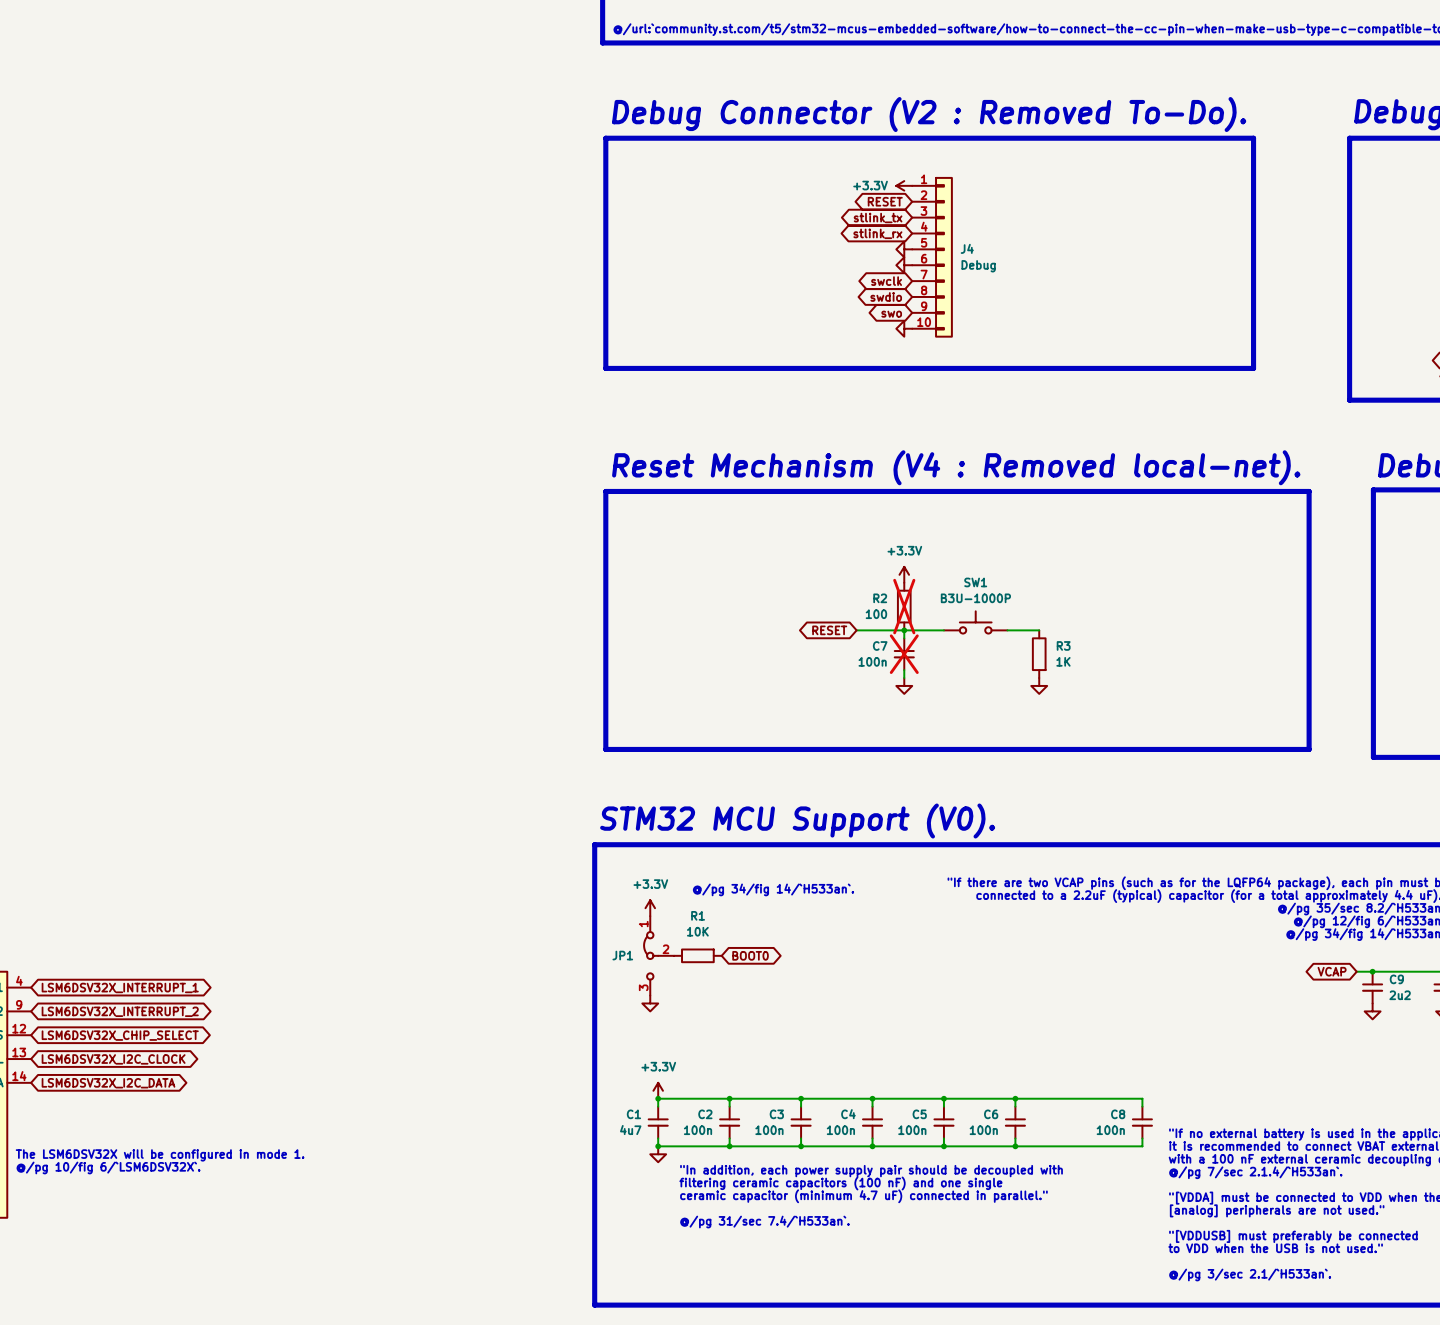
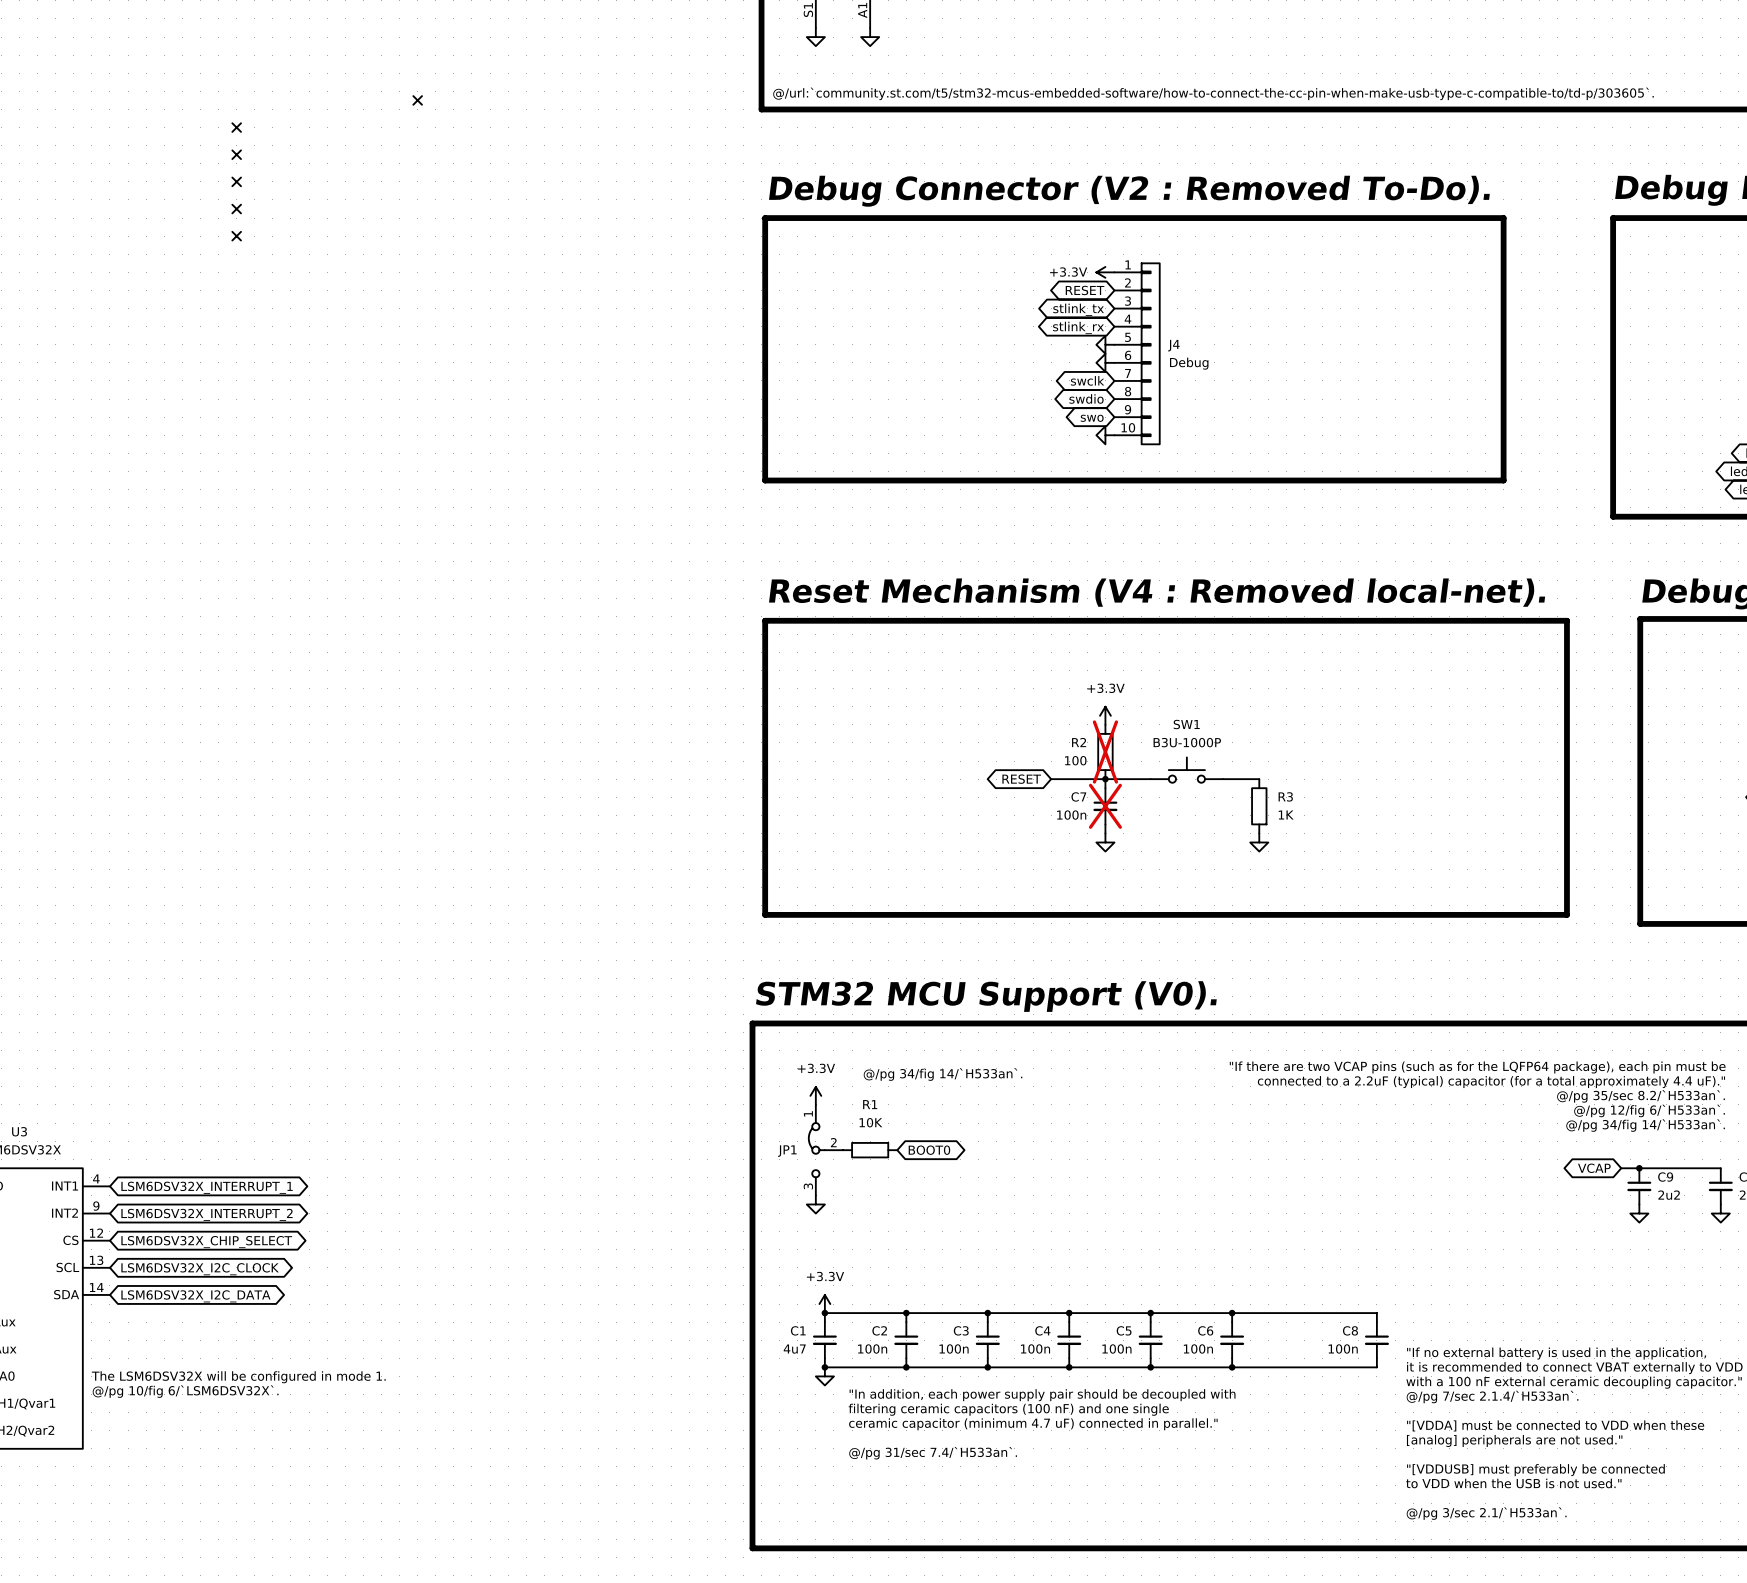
no-connect mark: none -> (417, 100)
no-connect mark: none -> (236, 127)
no-connect mark: none -> (236, 154)
no-connect mark: none -> (236, 181)
no-connect mark: none -> (236, 209)
no-connect mark: none -> (236, 236)

